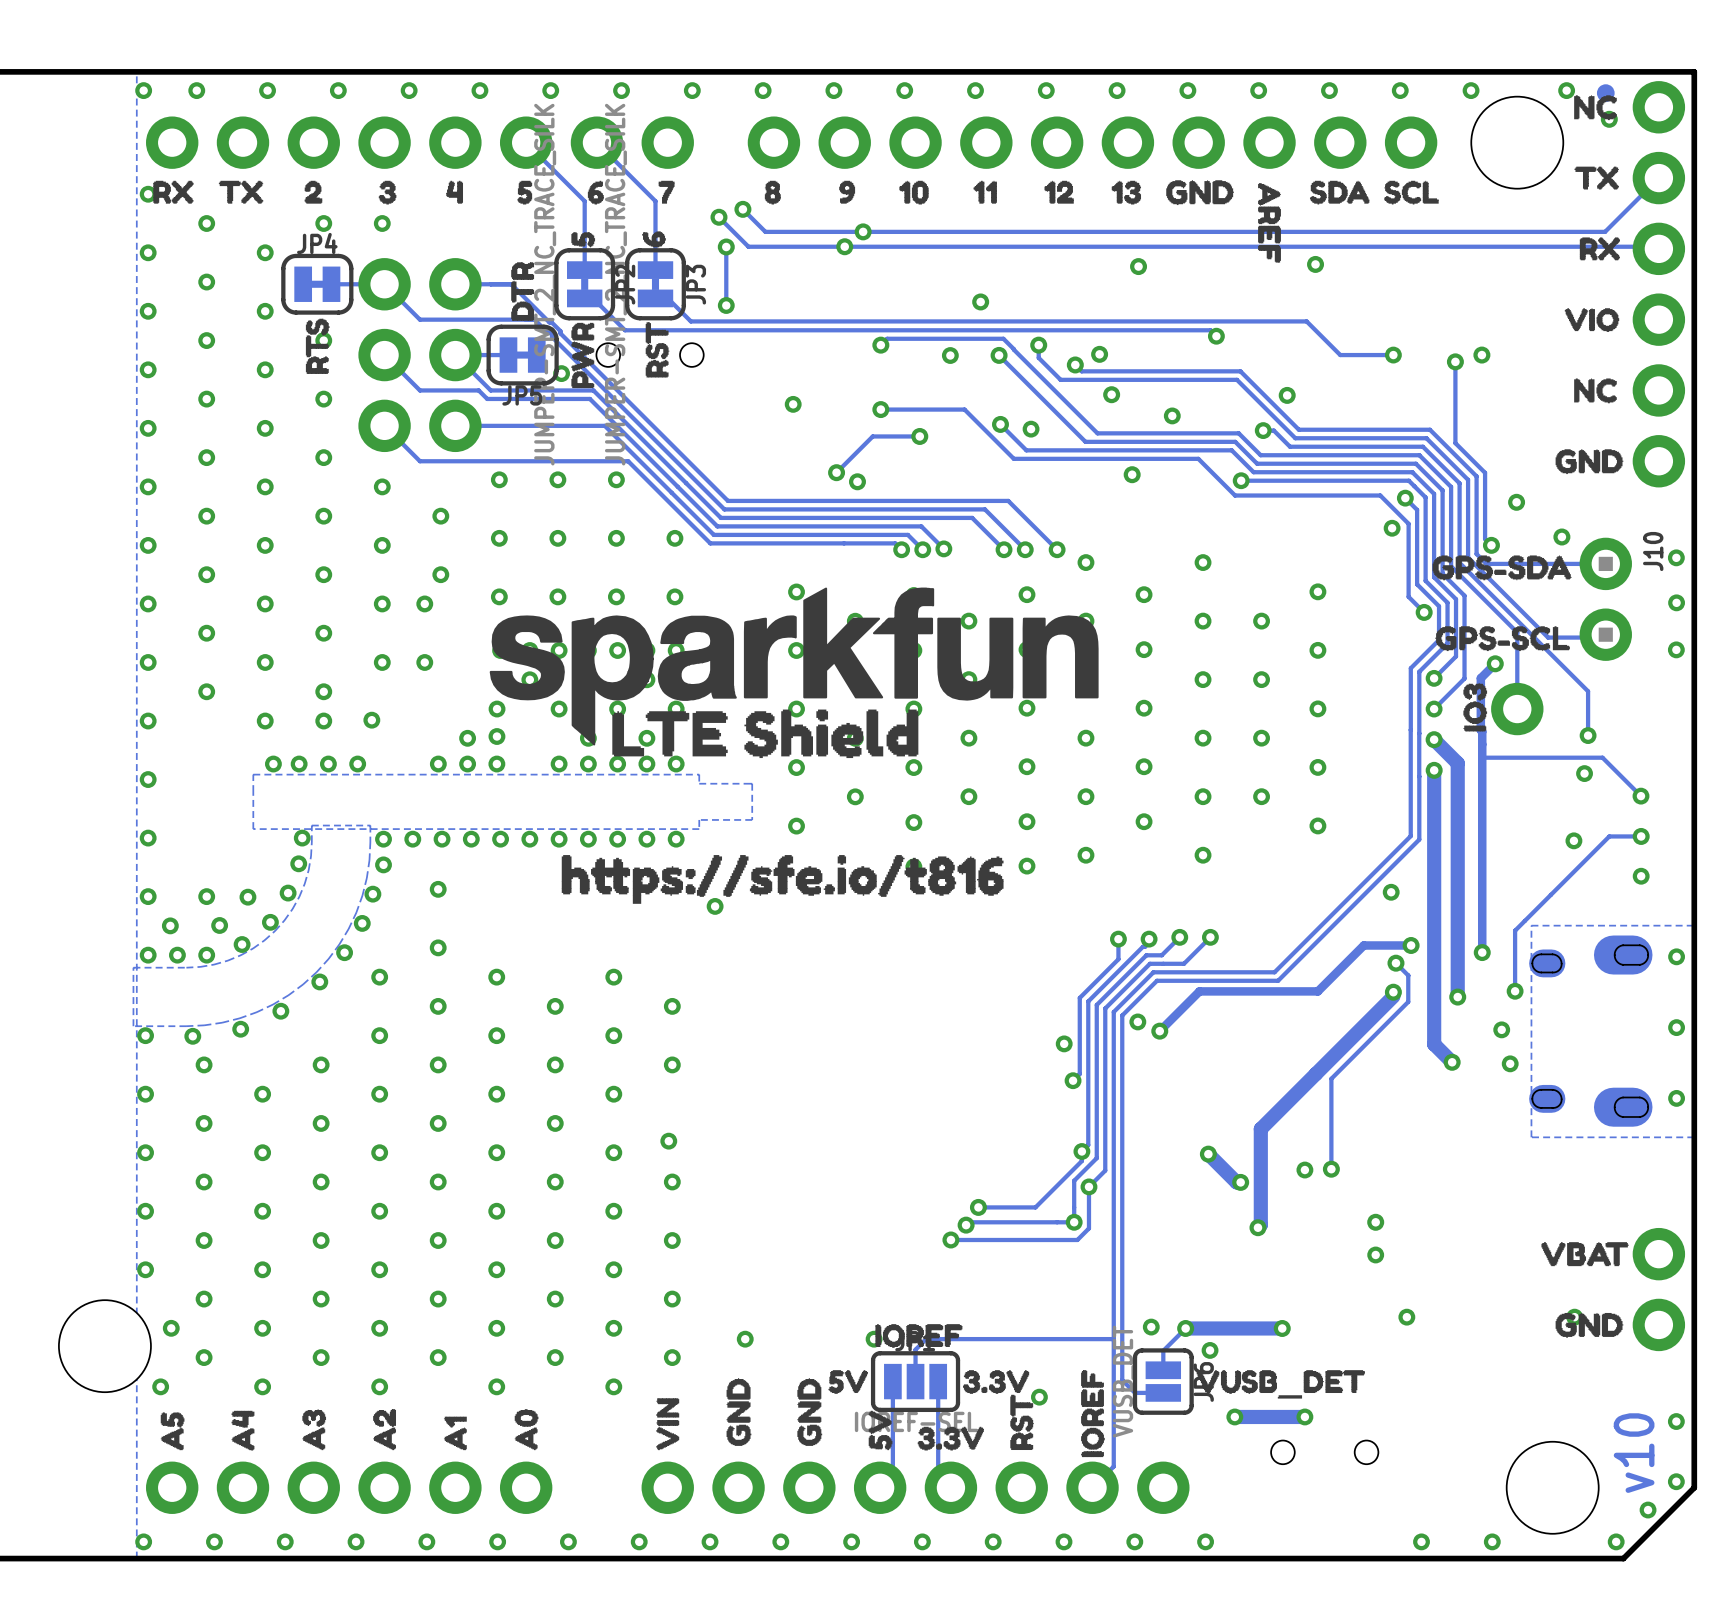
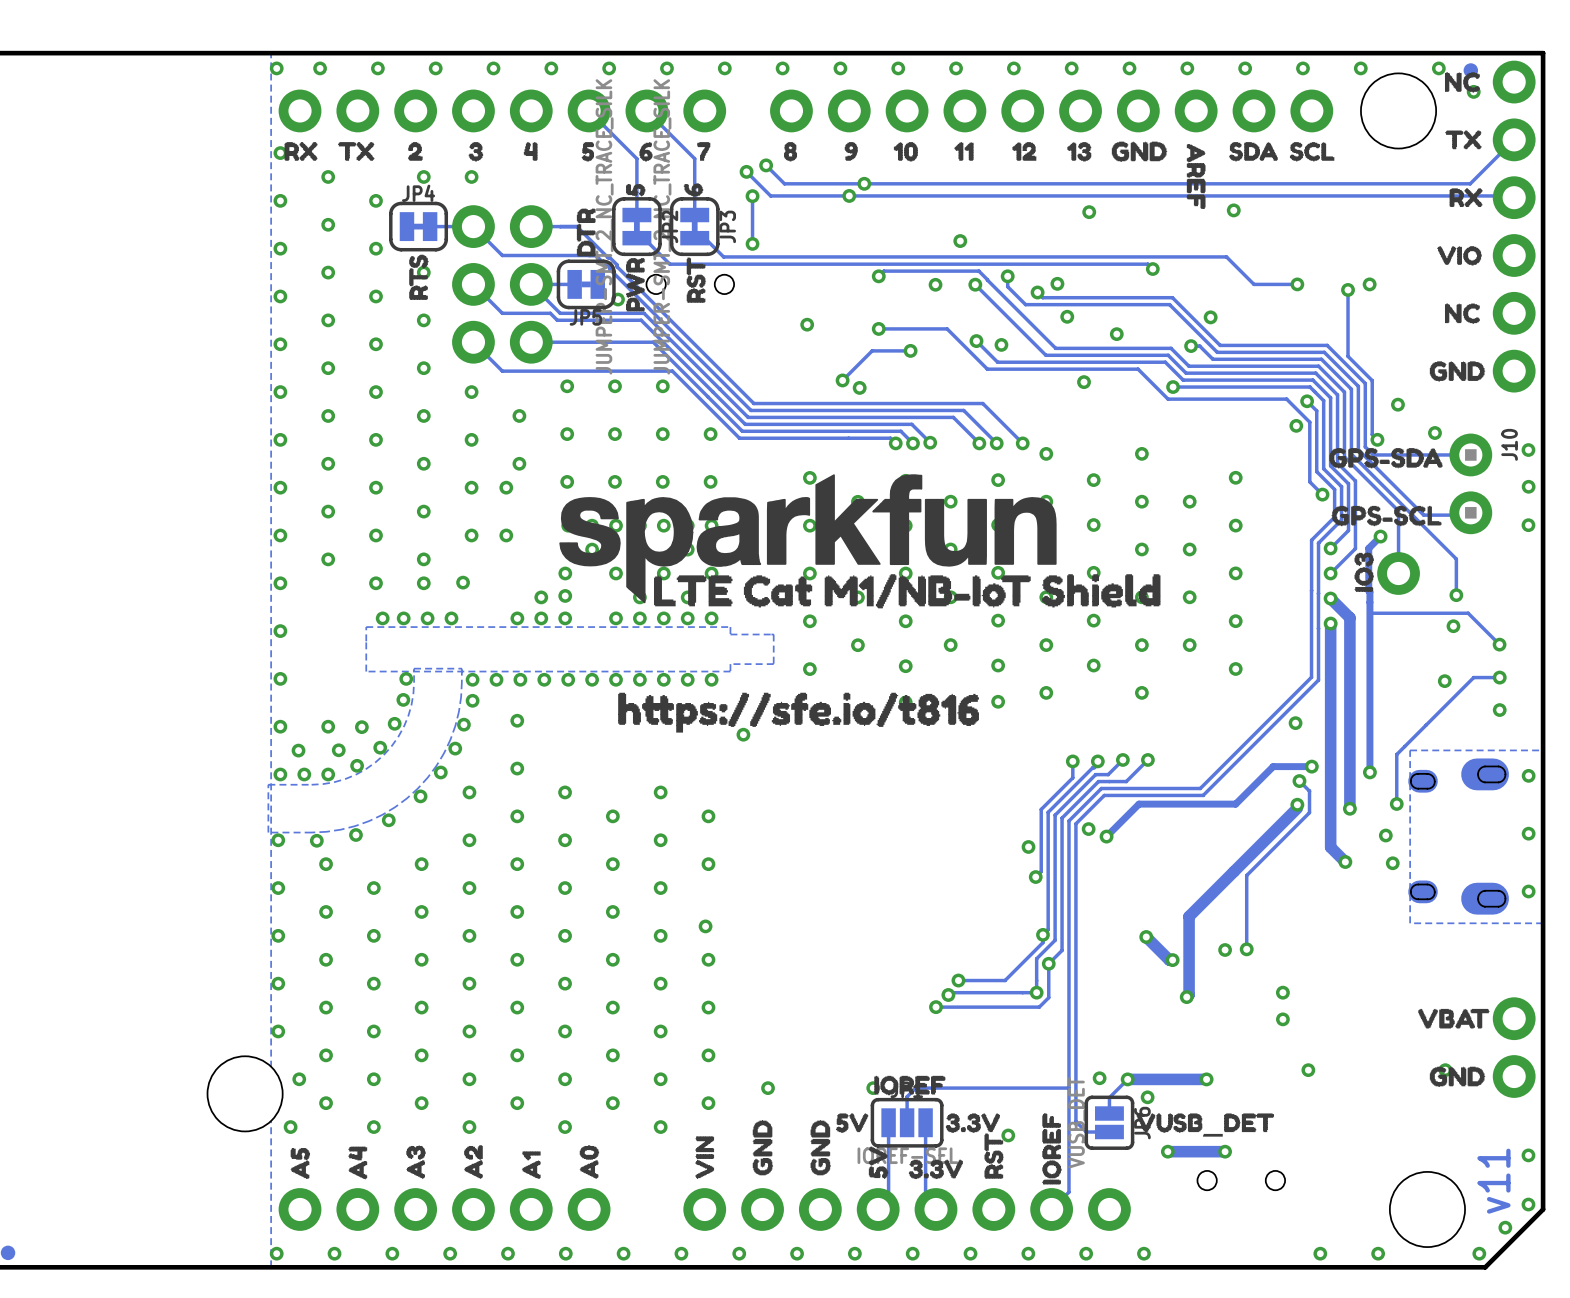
drawing: none -> [653, 574, 1161, 609]
drawing: [612, 709, 919, 759] -> none
text: v10 (1634, 1453) -> v11 (1493, 1181)

